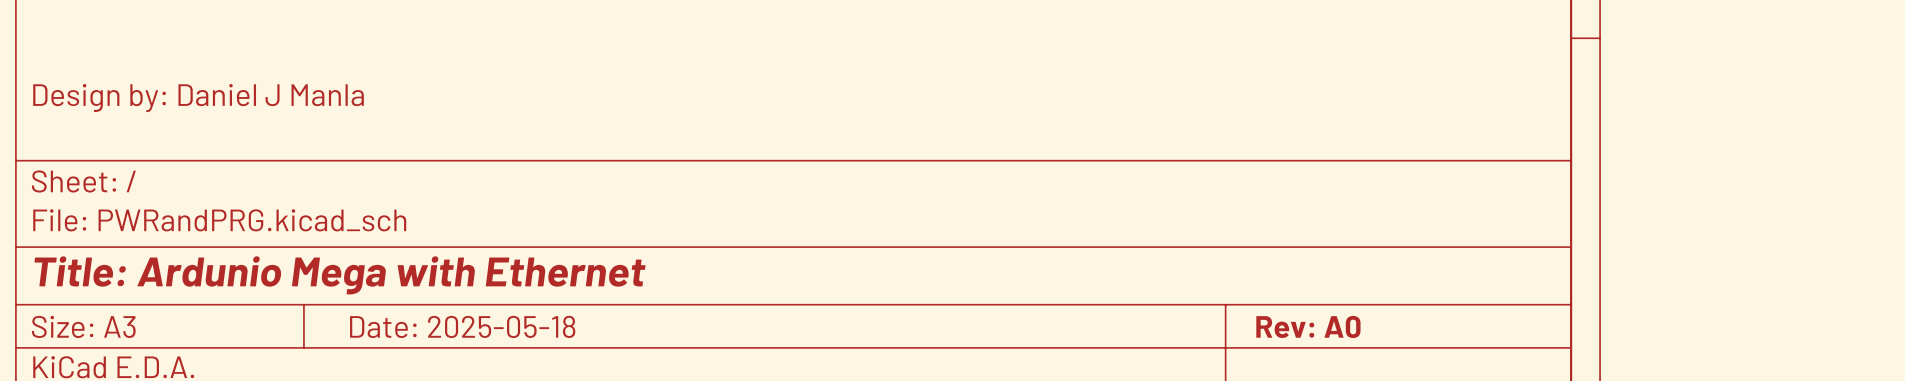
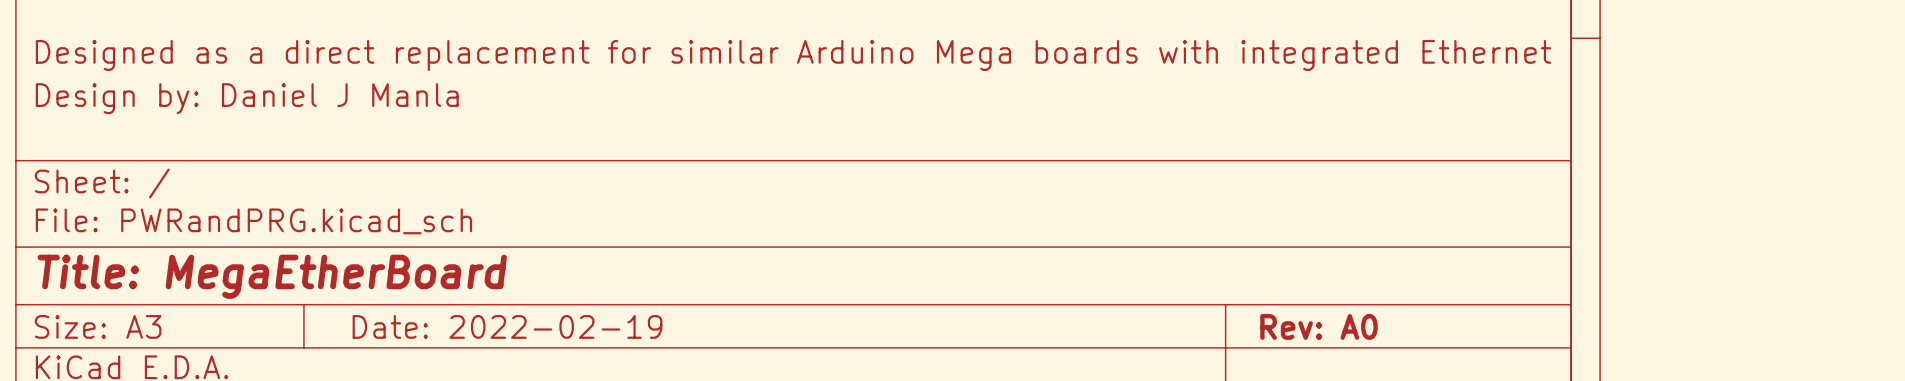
title block: none -> Designed as a direct replacement for similar Arduino Mega boards with integrated Ethernet (793, 55)
title block: Title: Ardunio Mega with Ethernet (339, 275) -> Title: MegaEtherBoard (272, 276)
title block: Date: 2025-05-18 (462, 326) -> Date: 2022-02-19 (507, 326)

